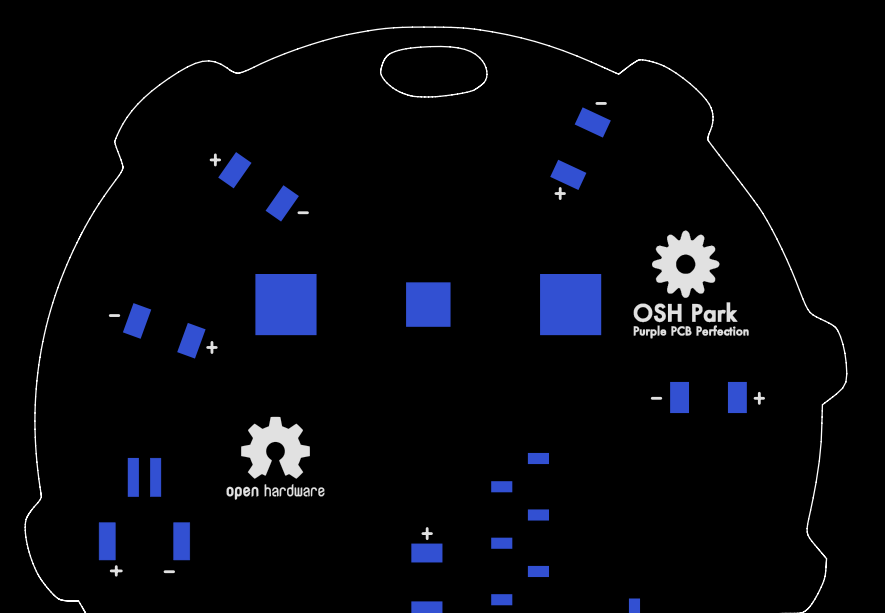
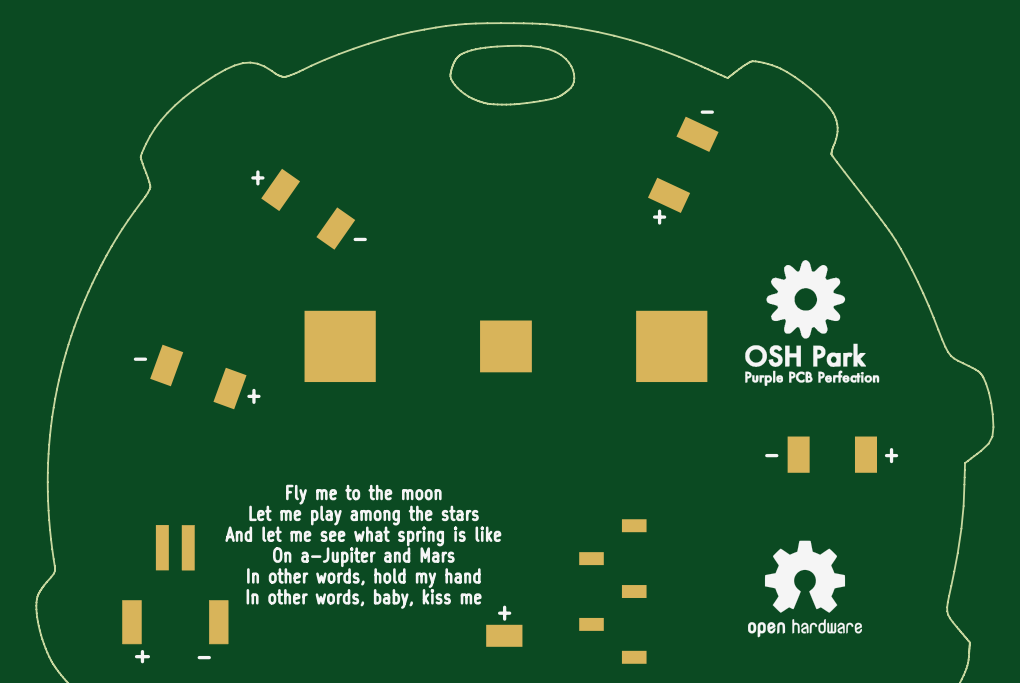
drawing: [226, 416, 325, 500] -> none
text: none -> Fly me to the moon (363, 494)
text: none -> Let me play among the stars (364, 515)
text: none -> And let me see what spring is like (363, 536)
drawing: none -> [748, 540, 863, 638]
text: none -> On a-Jupiter and Mars (363, 557)
text: none -> In other words, hold my hand (363, 578)
text: none -> In other words, baby, kiss me (364, 598)

